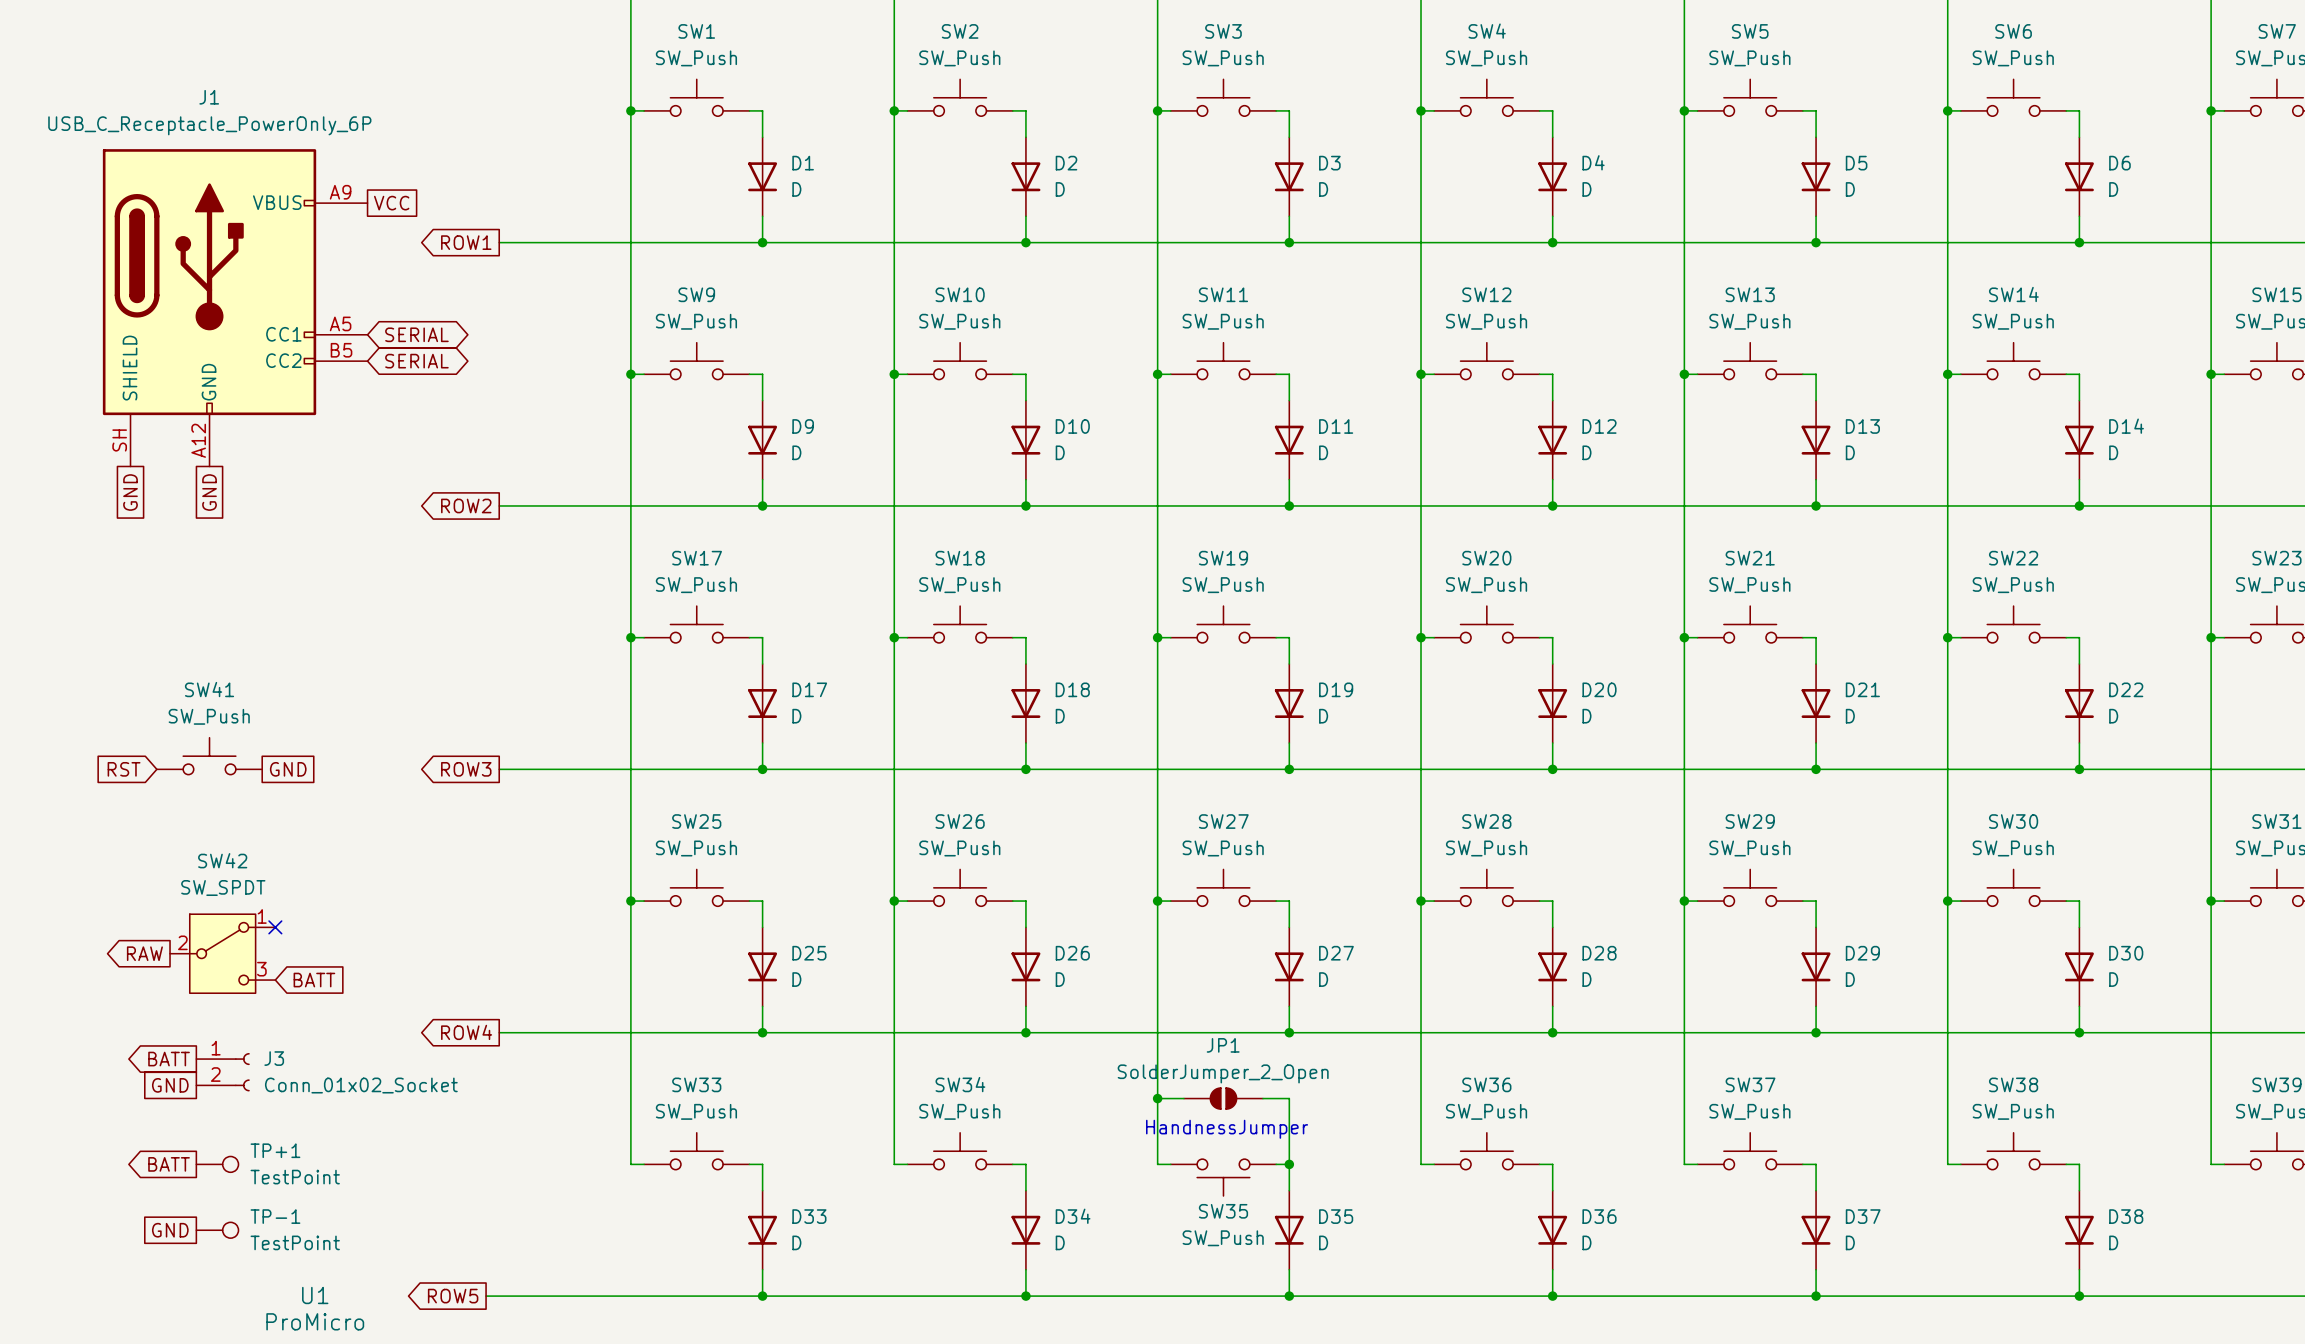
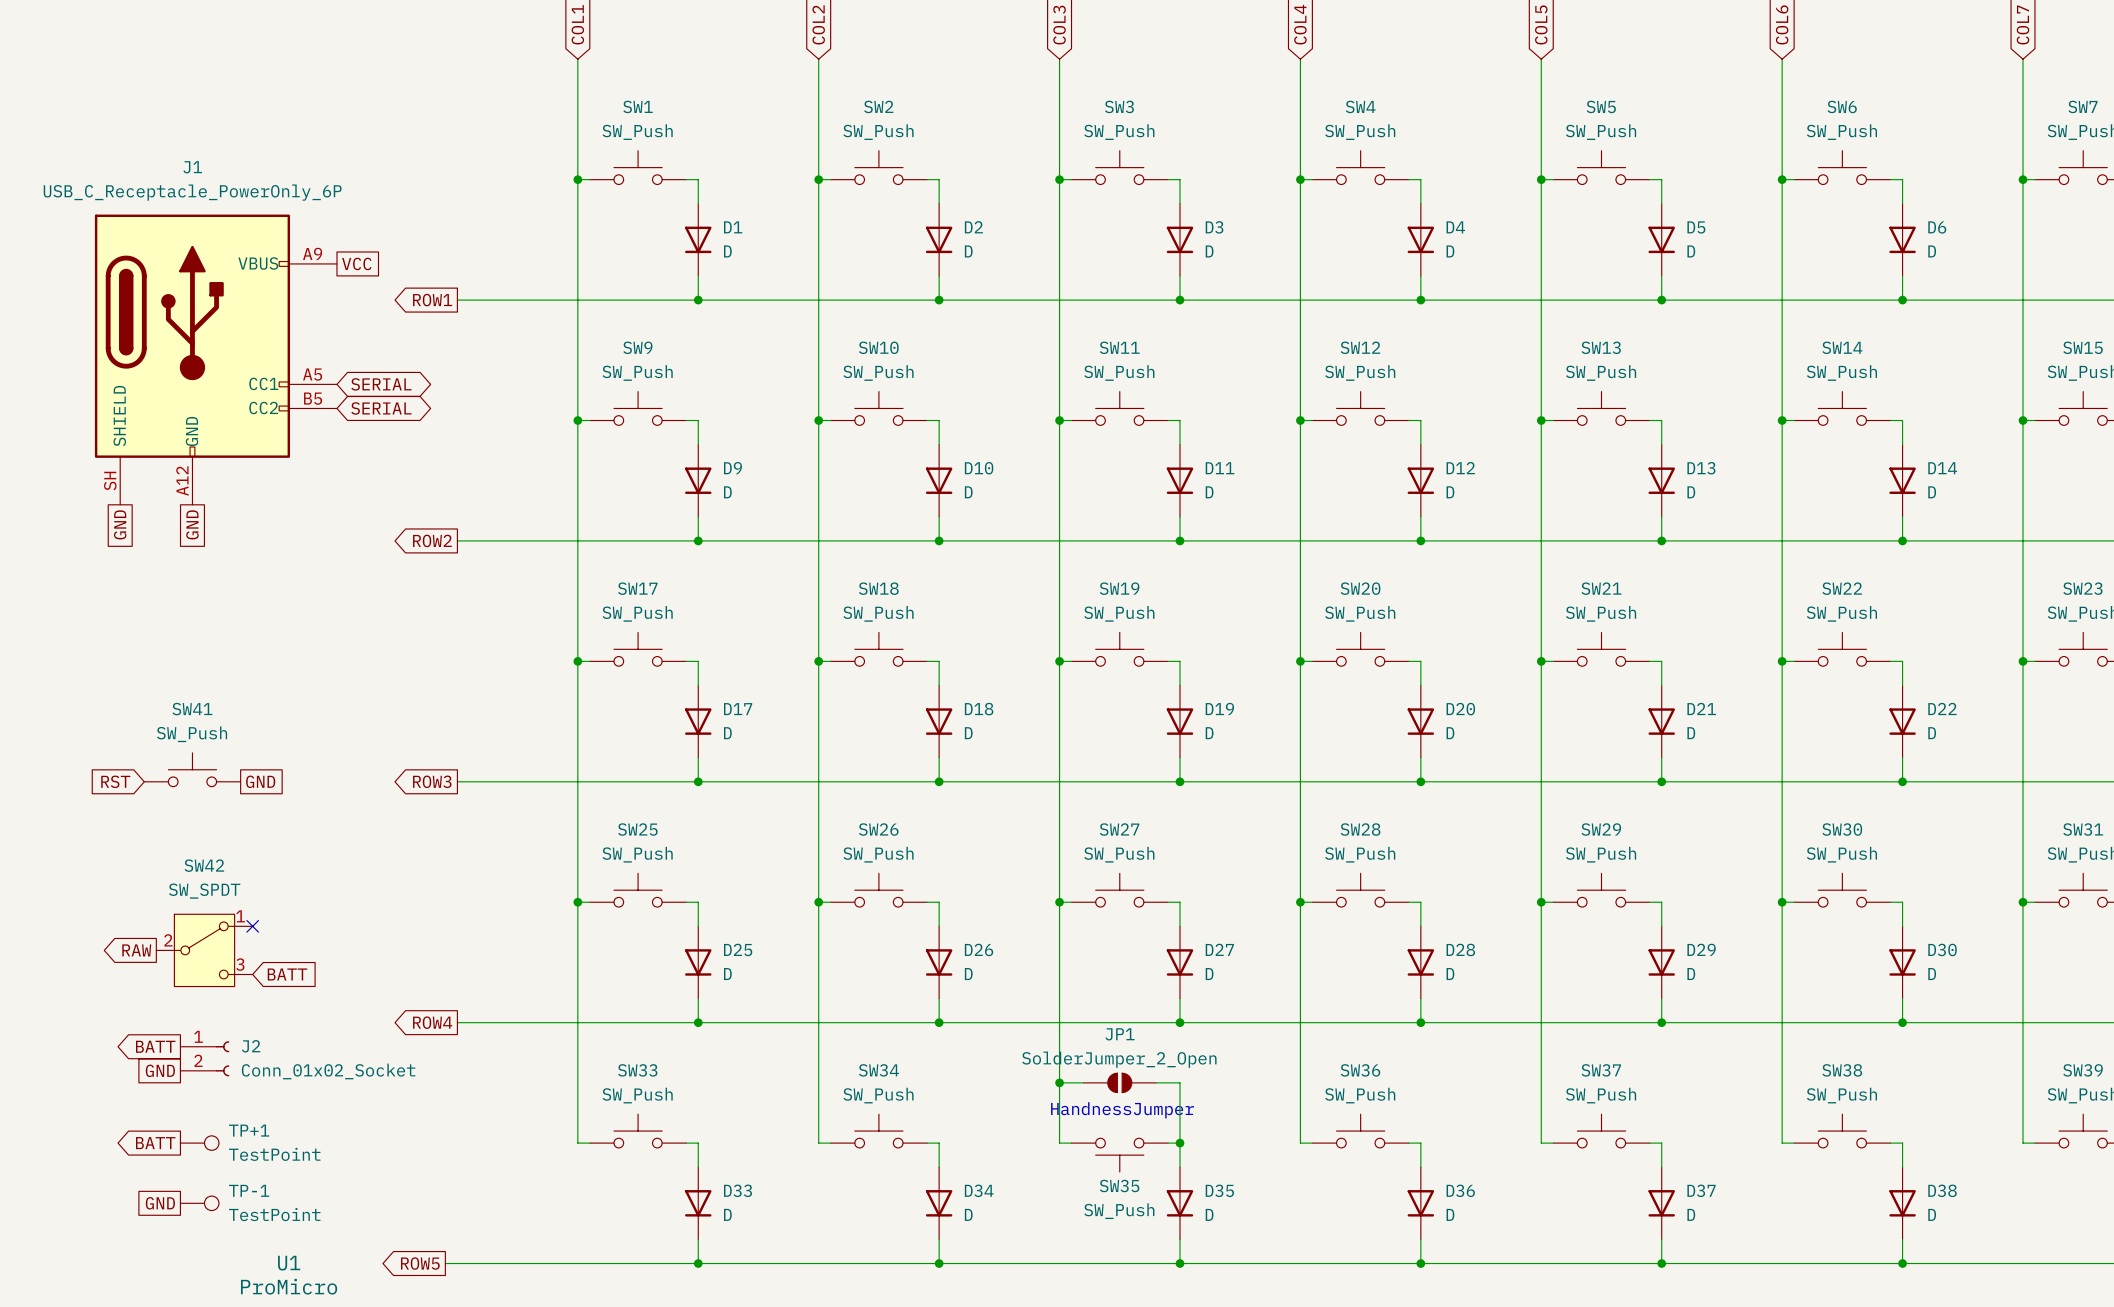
J3 name: J3 (274, 1058) -> J2 (251, 1046)

